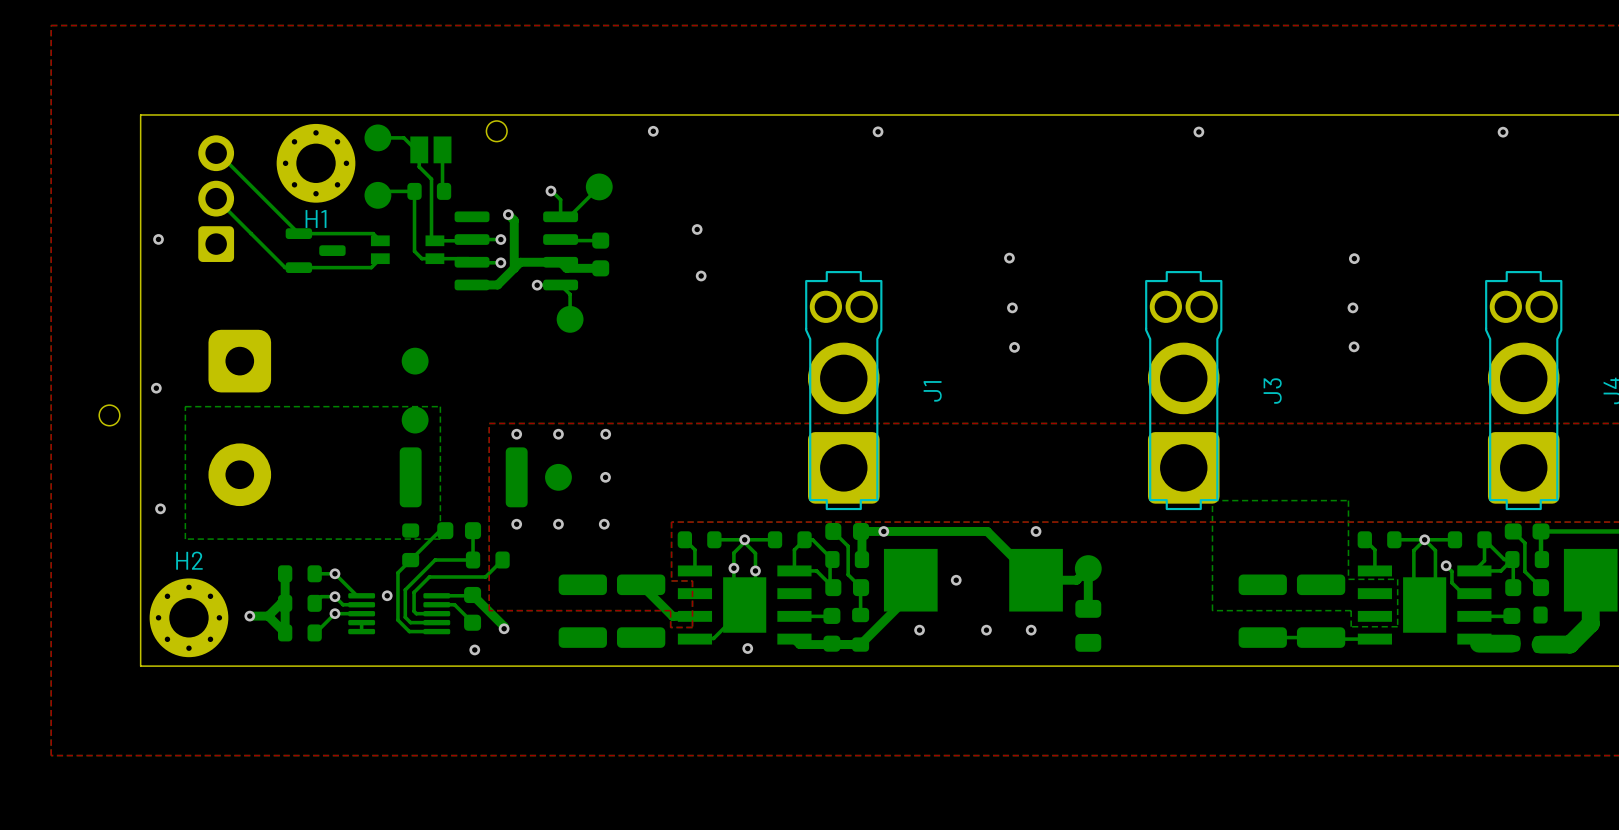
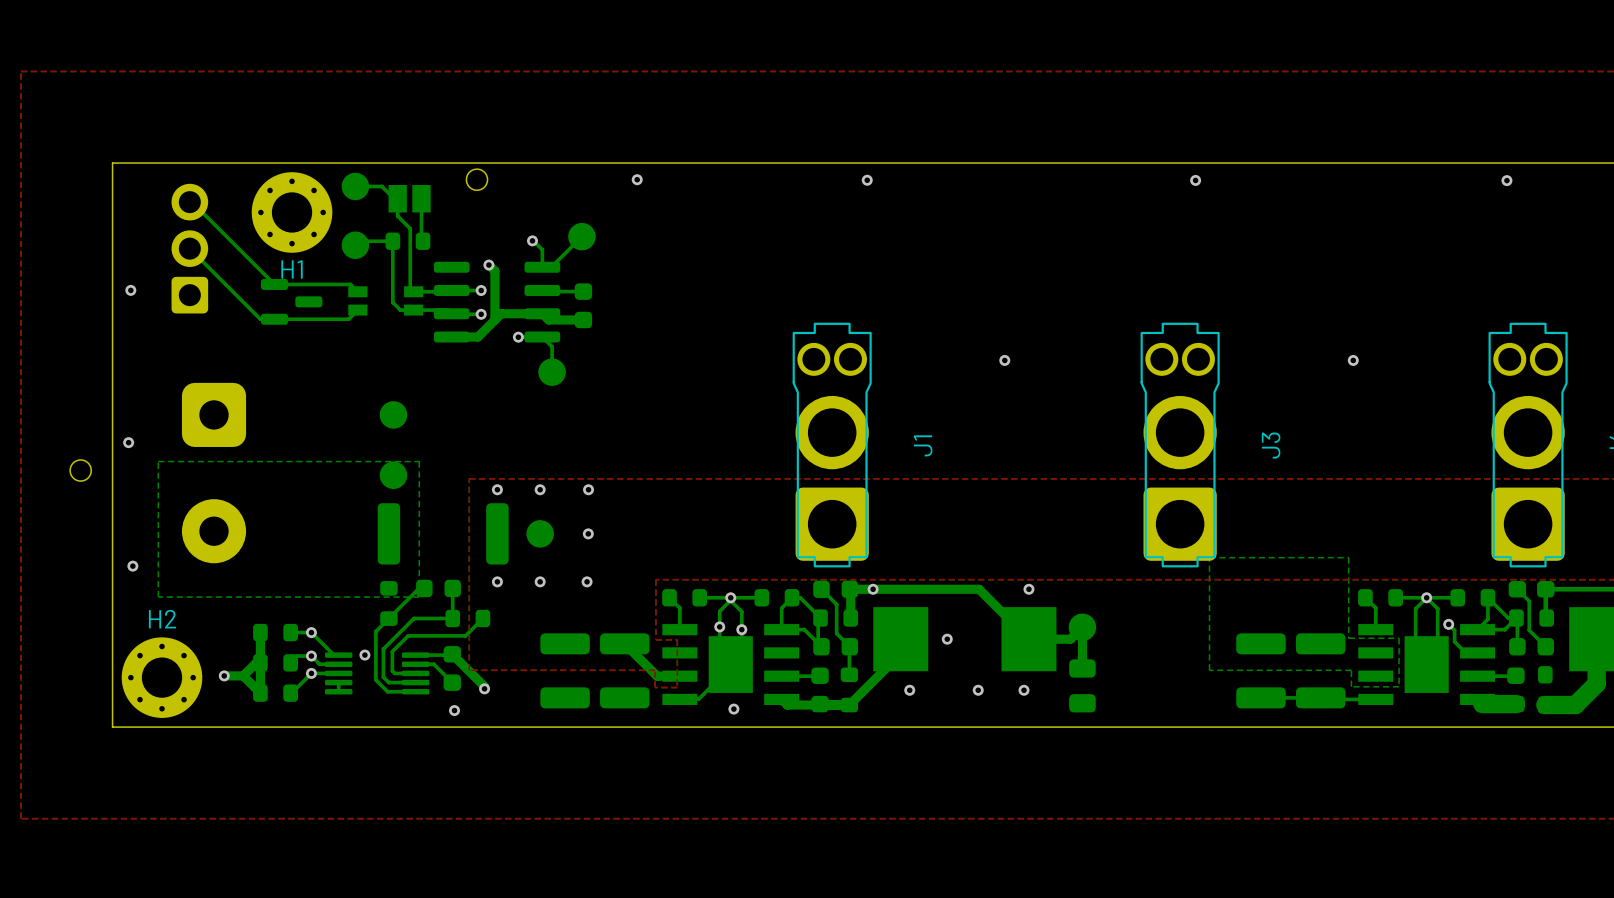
via: (697, 229) -> none
via: (1009, 258) -> none
via: (1354, 258) -> none
via: (701, 276) -> none
via: (1354, 346) -> none
via: (1014, 347) -> none

